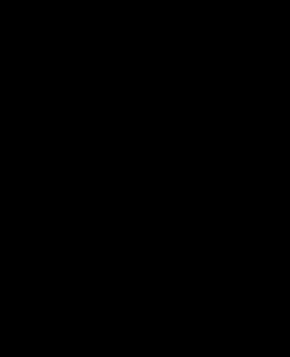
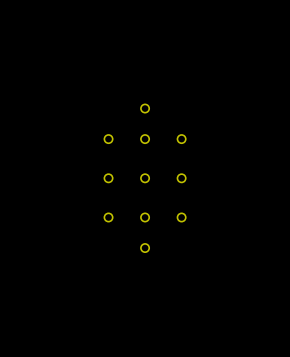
part: none -> (145, 178)

